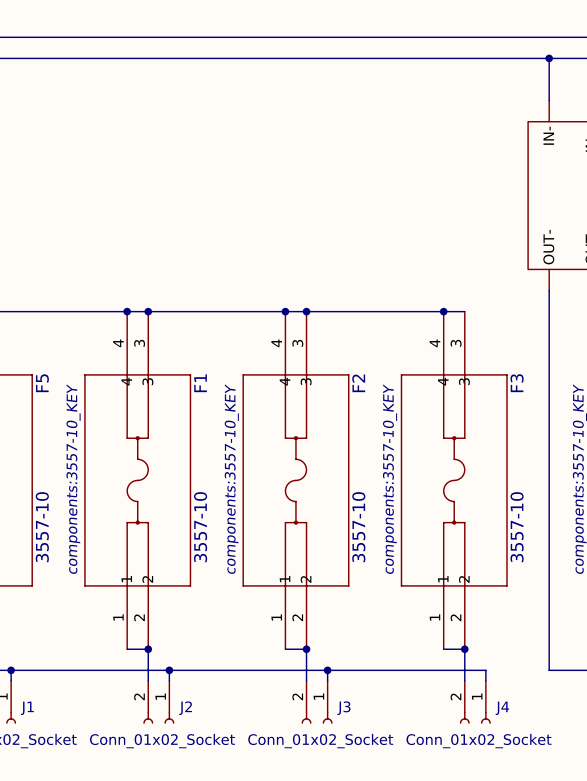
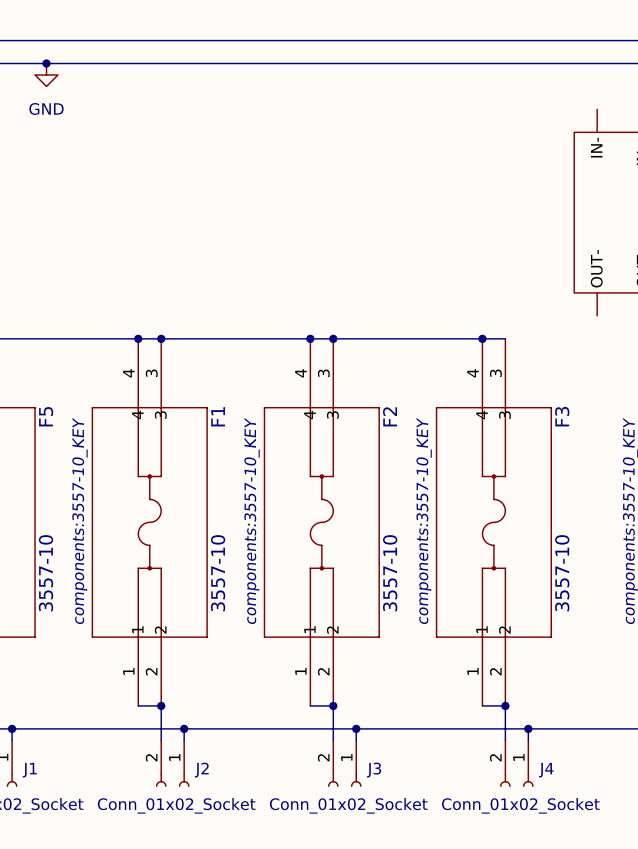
junction: none -> (46, 63)
wire: (549, 58) (549, 100) -> none
junction: (549, 58) -> none
power symbol: none -> GND (46, 74)
wire: (549, 290) (549, 670) -> (528, 728) (597, 728)
junction: none -> (528, 728)

